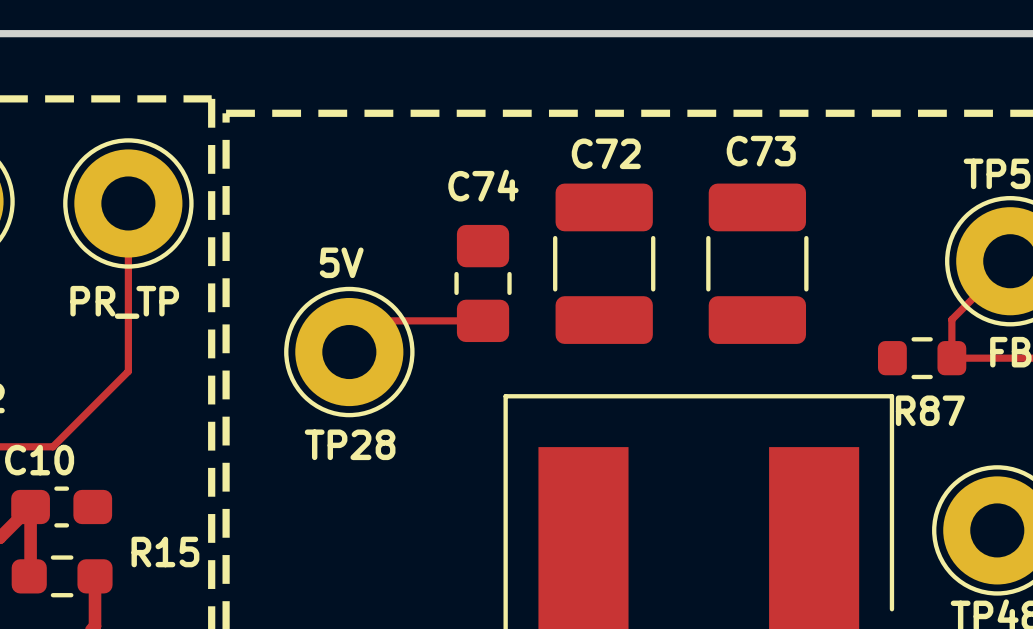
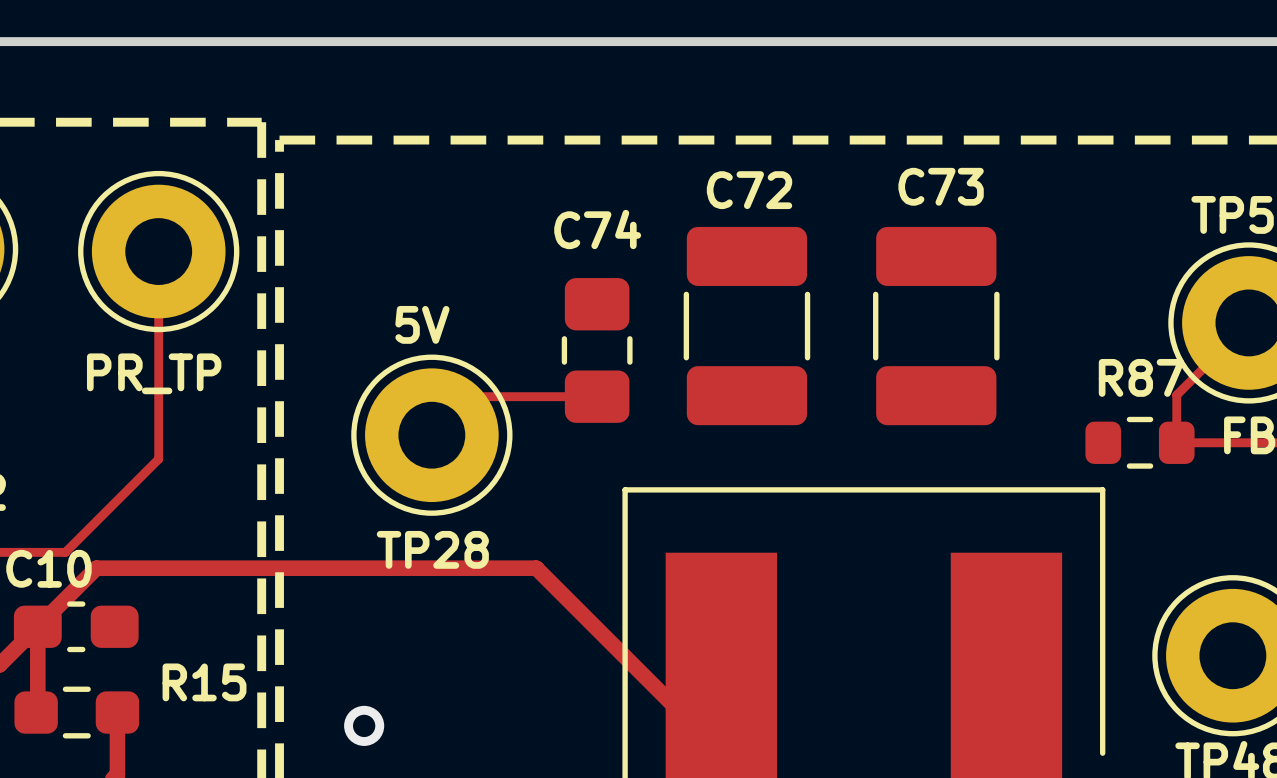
R87 name position: R87 (930, 410) -> R87 (1141, 377)
track: none -> (37, 626) (96, 568) (536, 568) (721, 753)
via: none -> (364, 725)

